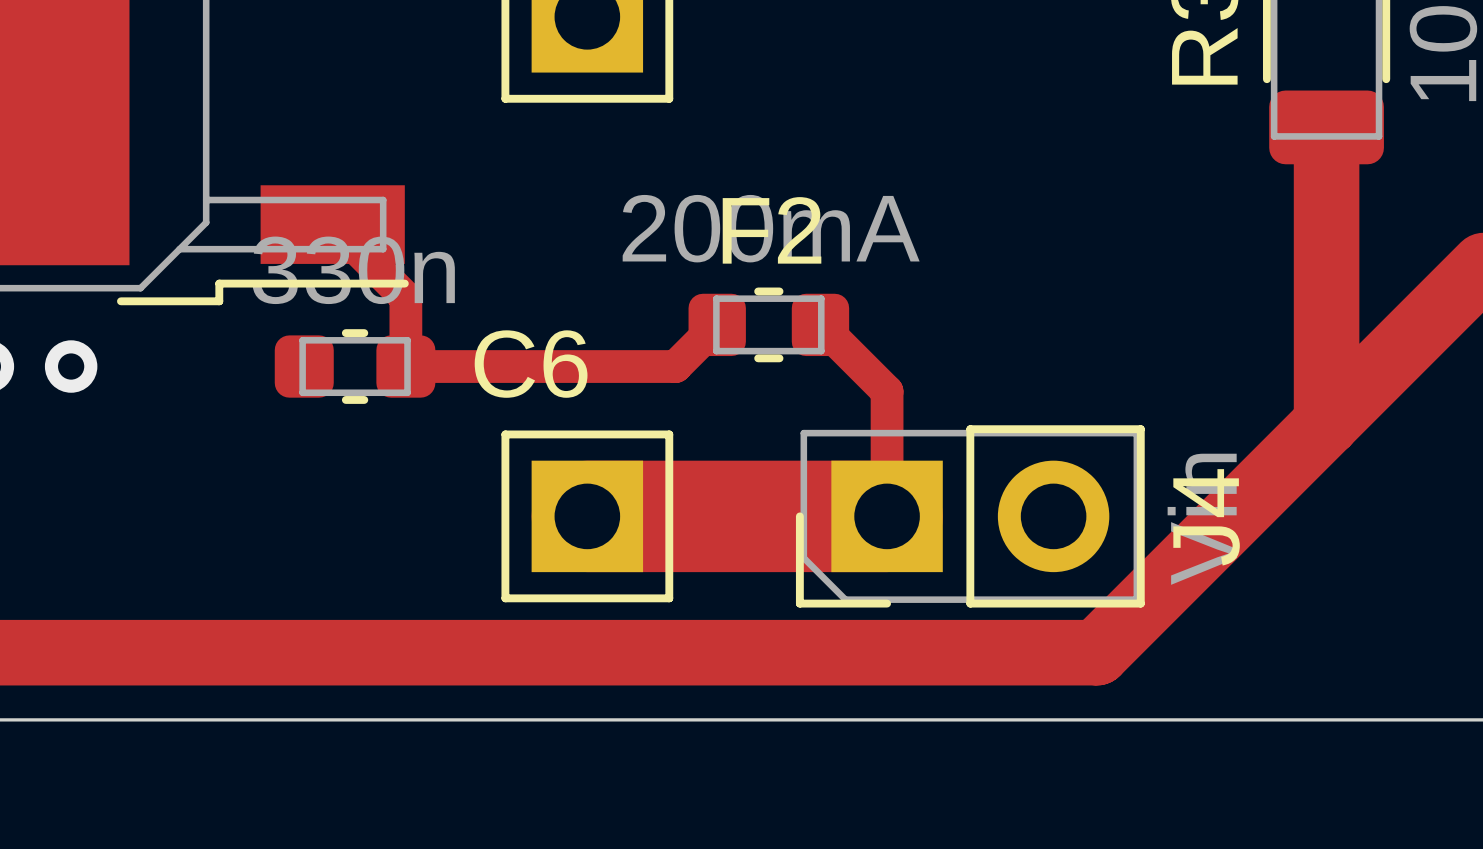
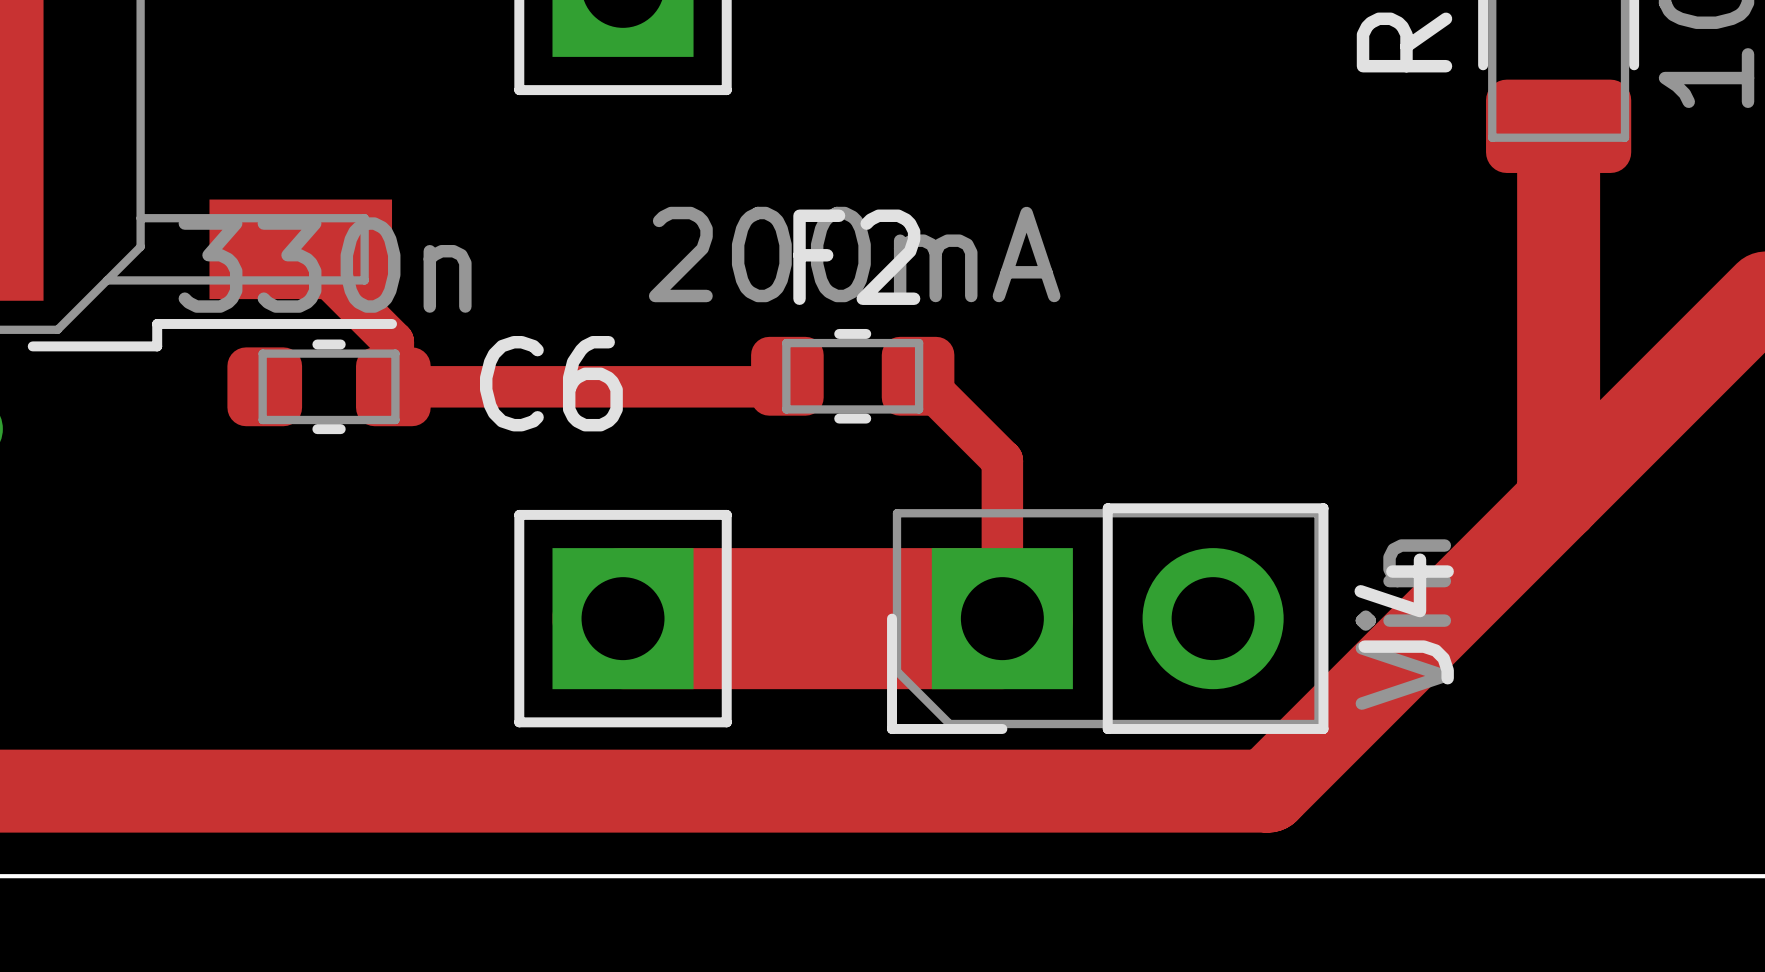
top track: (405, 333) (405, 366) (675, 366) (708, 333) -> (393, 386) (776, 386)
C6 position: (355, 366) -> (329, 386)

